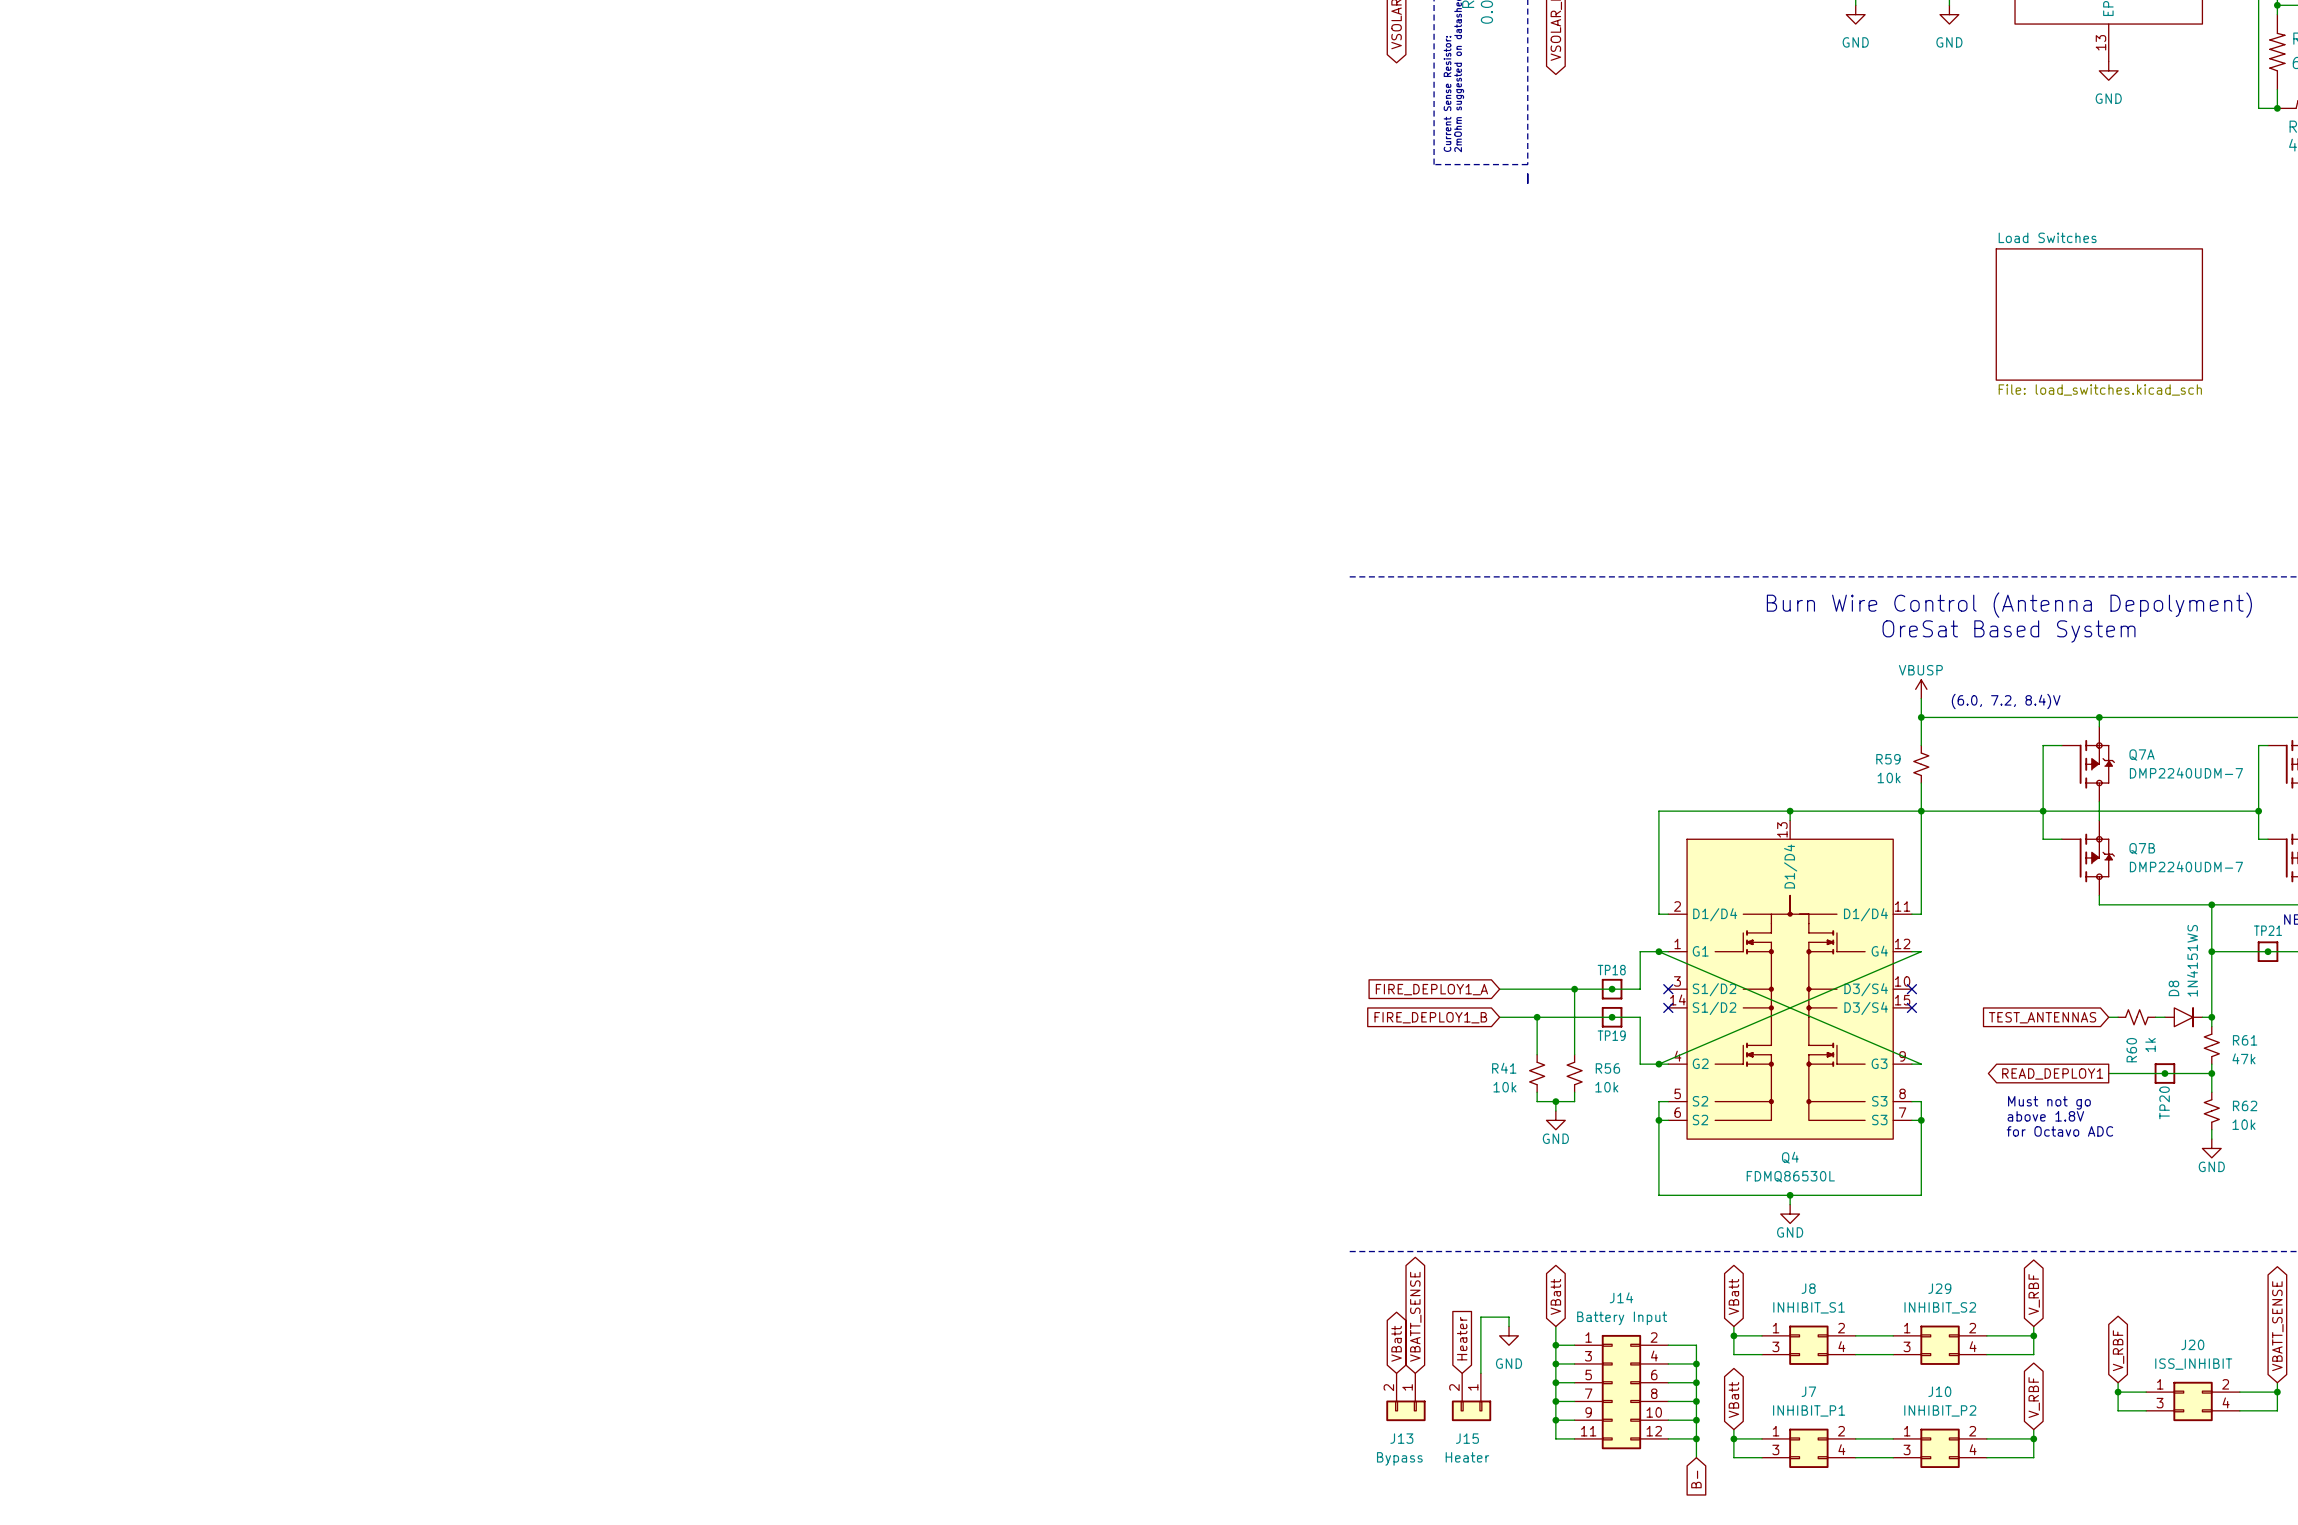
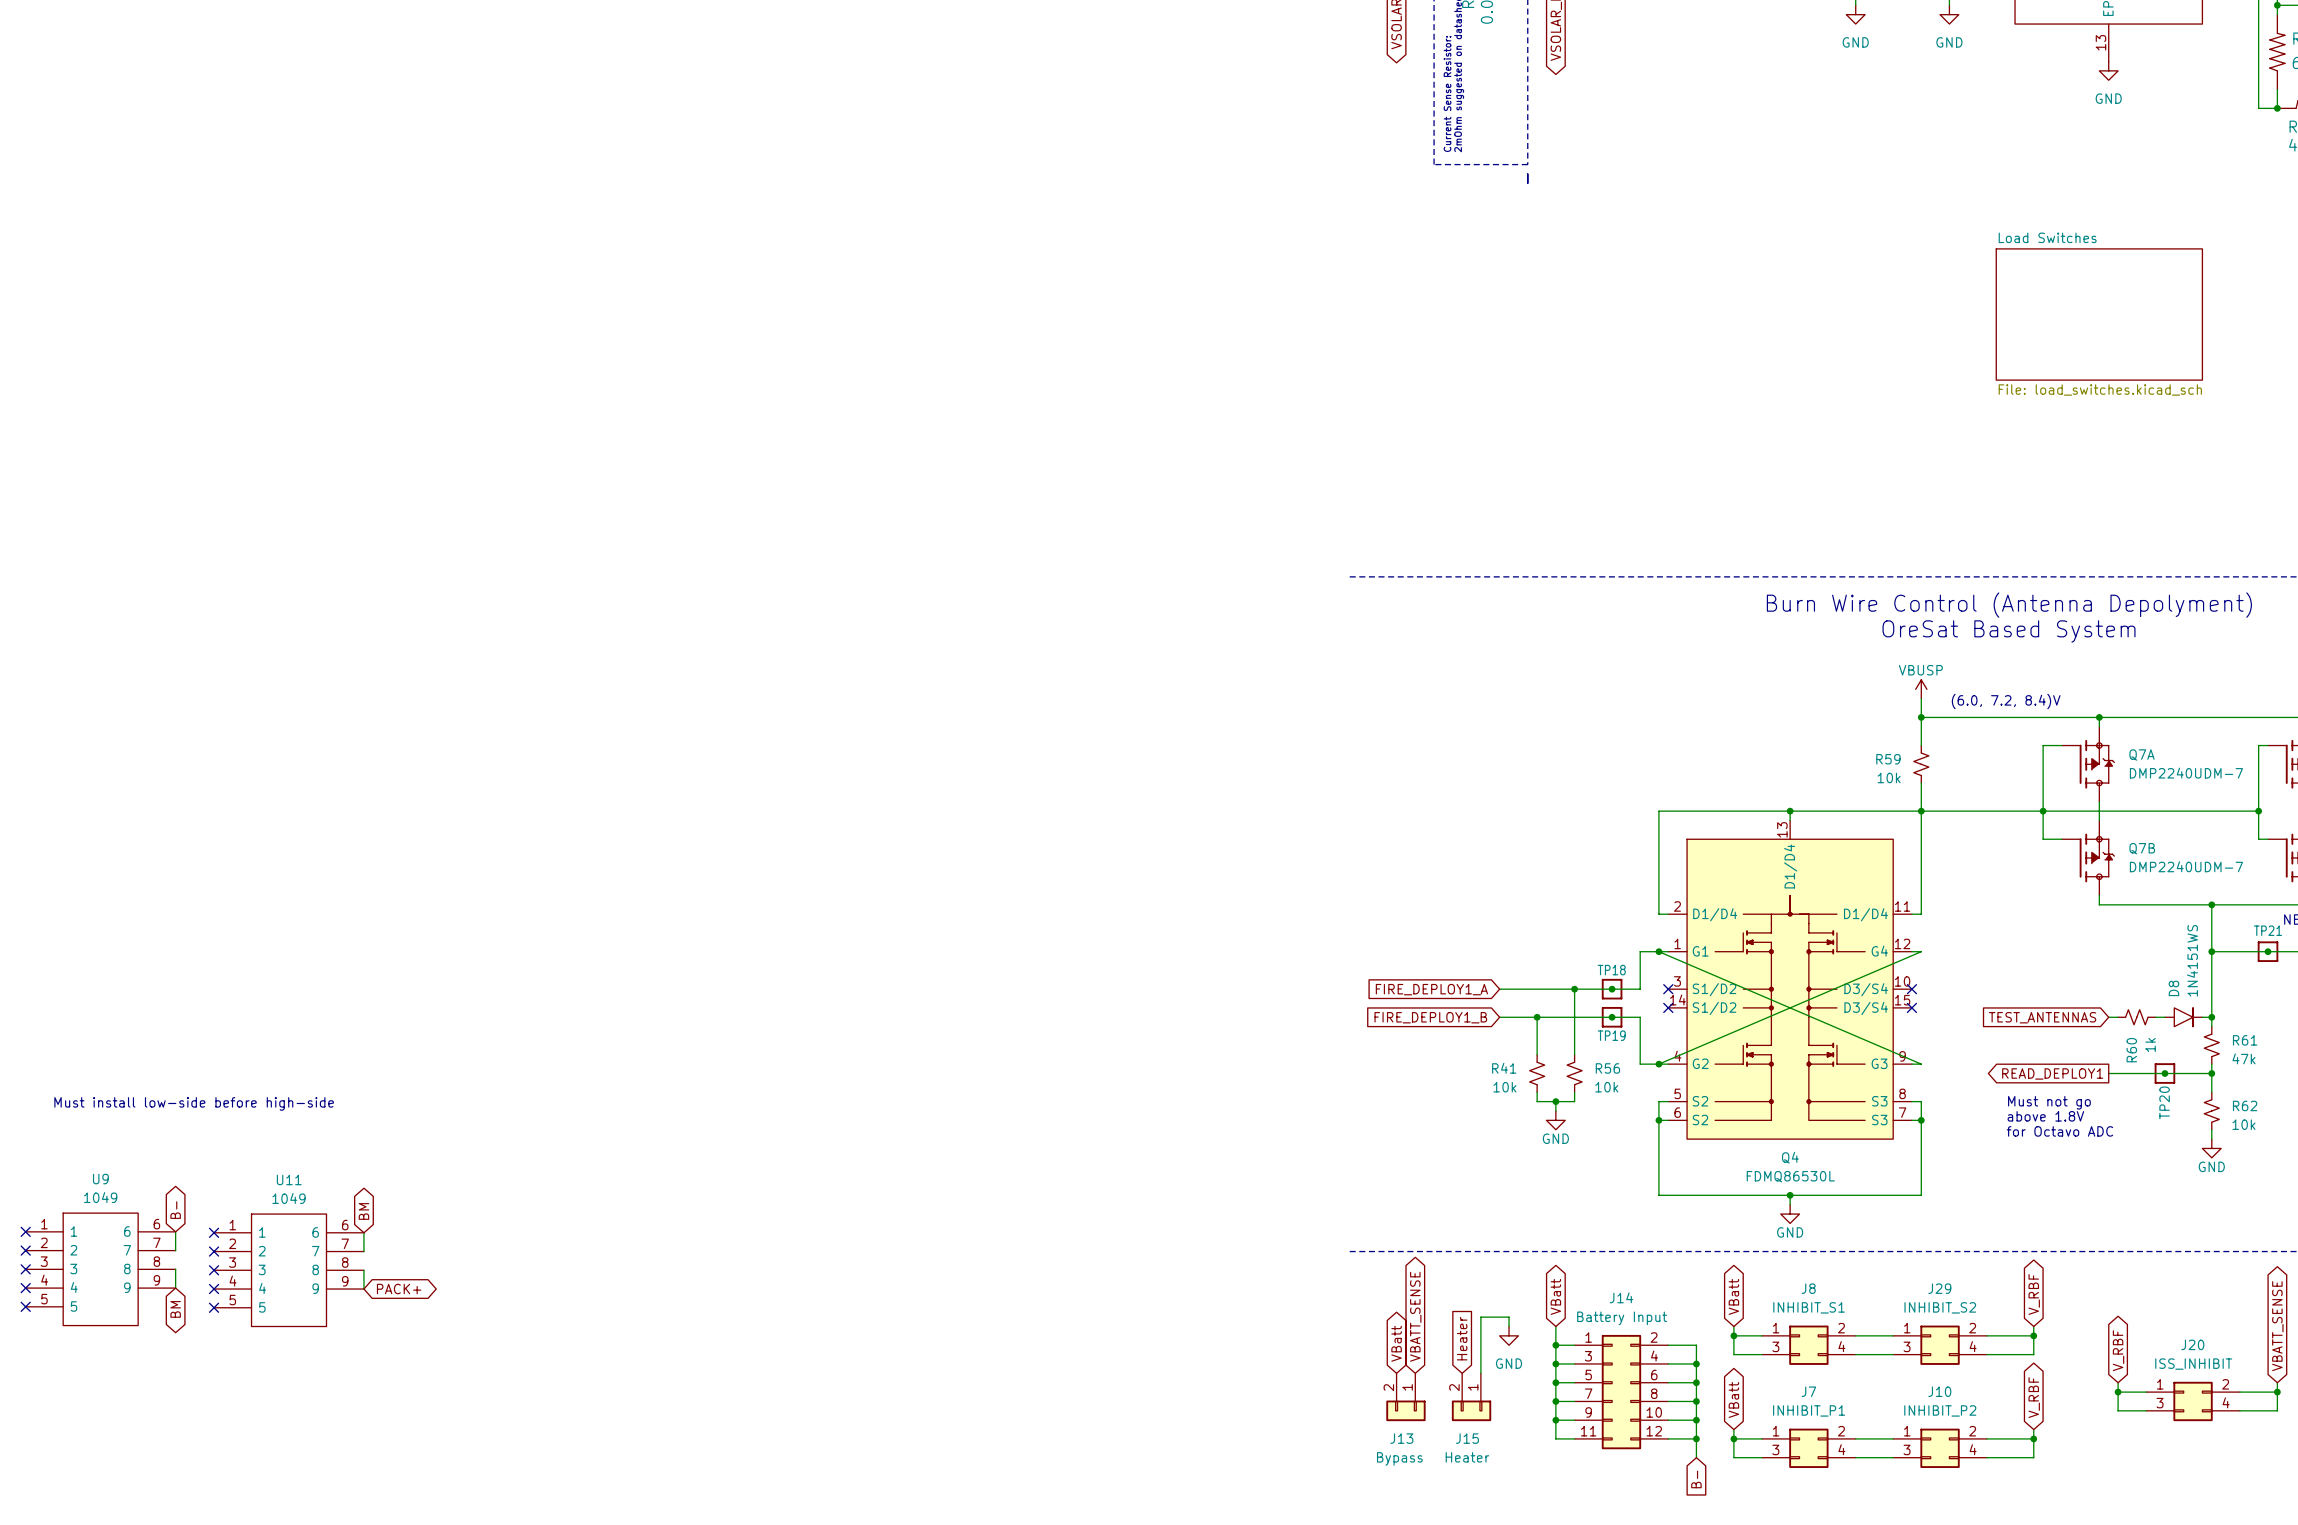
text: none -> Must install low-side before high-side (194, 1103)
global label: none -> B- (175, 1210)
global label: none -> BM (363, 1211)
no-connect mark: none -> (25, 1231)
wire: none -> (175, 1231) (175, 1250)
no-connect mark: none -> (214, 1232)
wire: none -> (363, 1232) (363, 1251)
no-connect mark: none -> (25, 1250)
no-connect mark: none -> (214, 1251)
no-connect mark: none -> (25, 1269)
U9: none -> 1049 (100, 1269)
wire: none -> (175, 1269) (175, 1288)
no-connect mark: none -> (214, 1270)
U11: none -> 1049 (289, 1270)
wire: none -> (363, 1270) (363, 1289)
no-connect mark: none -> (25, 1288)
no-connect mark: none -> (214, 1289)
global label: none -> PACK+ (399, 1289)
no-connect mark: none -> (25, 1306)
no-connect mark: none -> (214, 1307)
global label: none -> BM (175, 1309)

